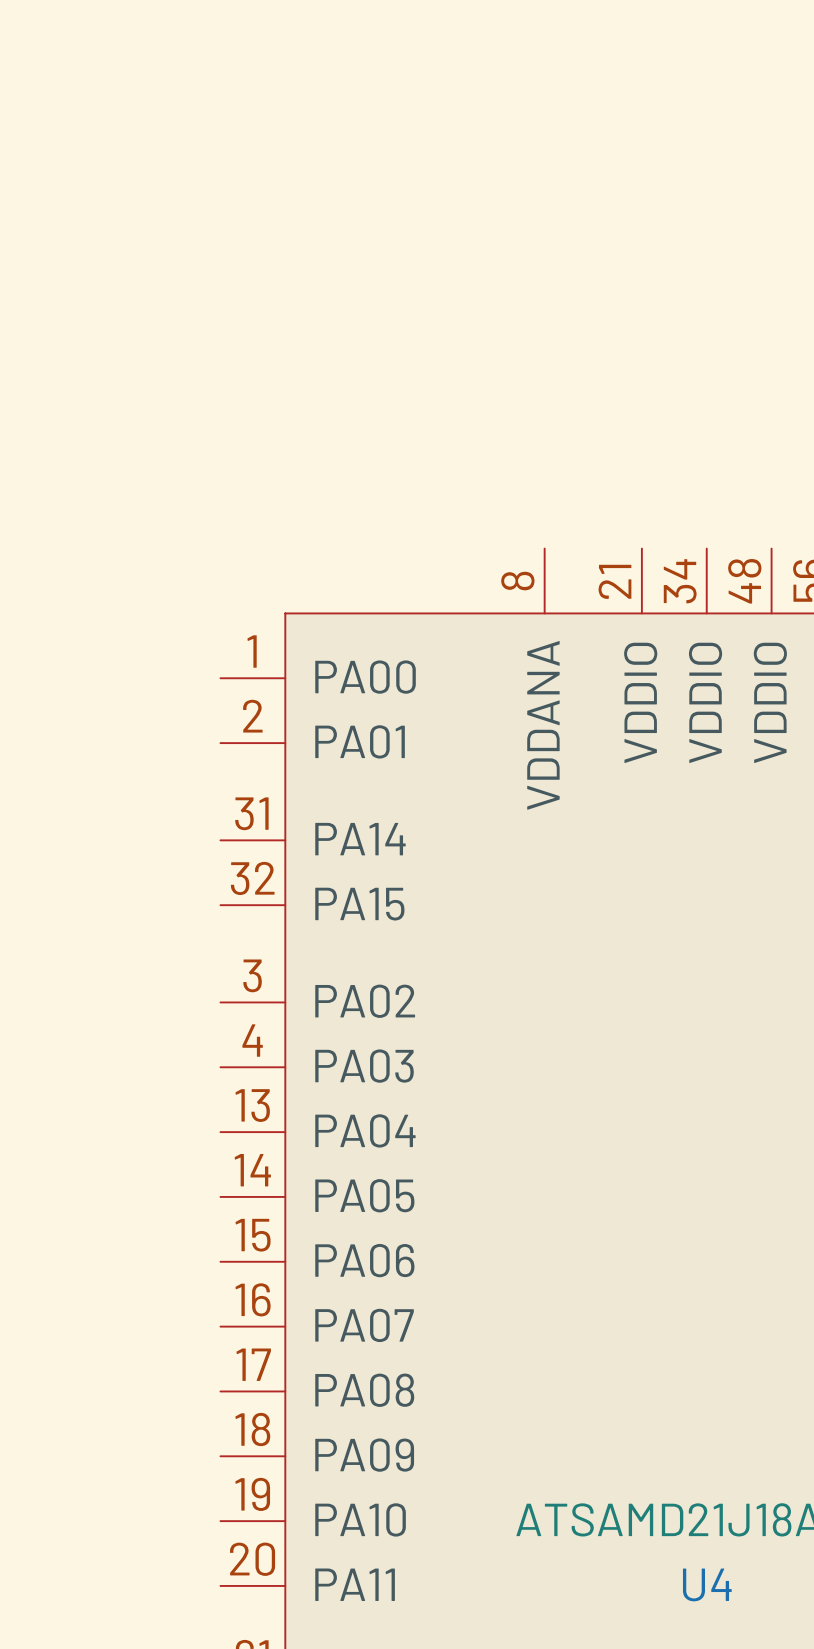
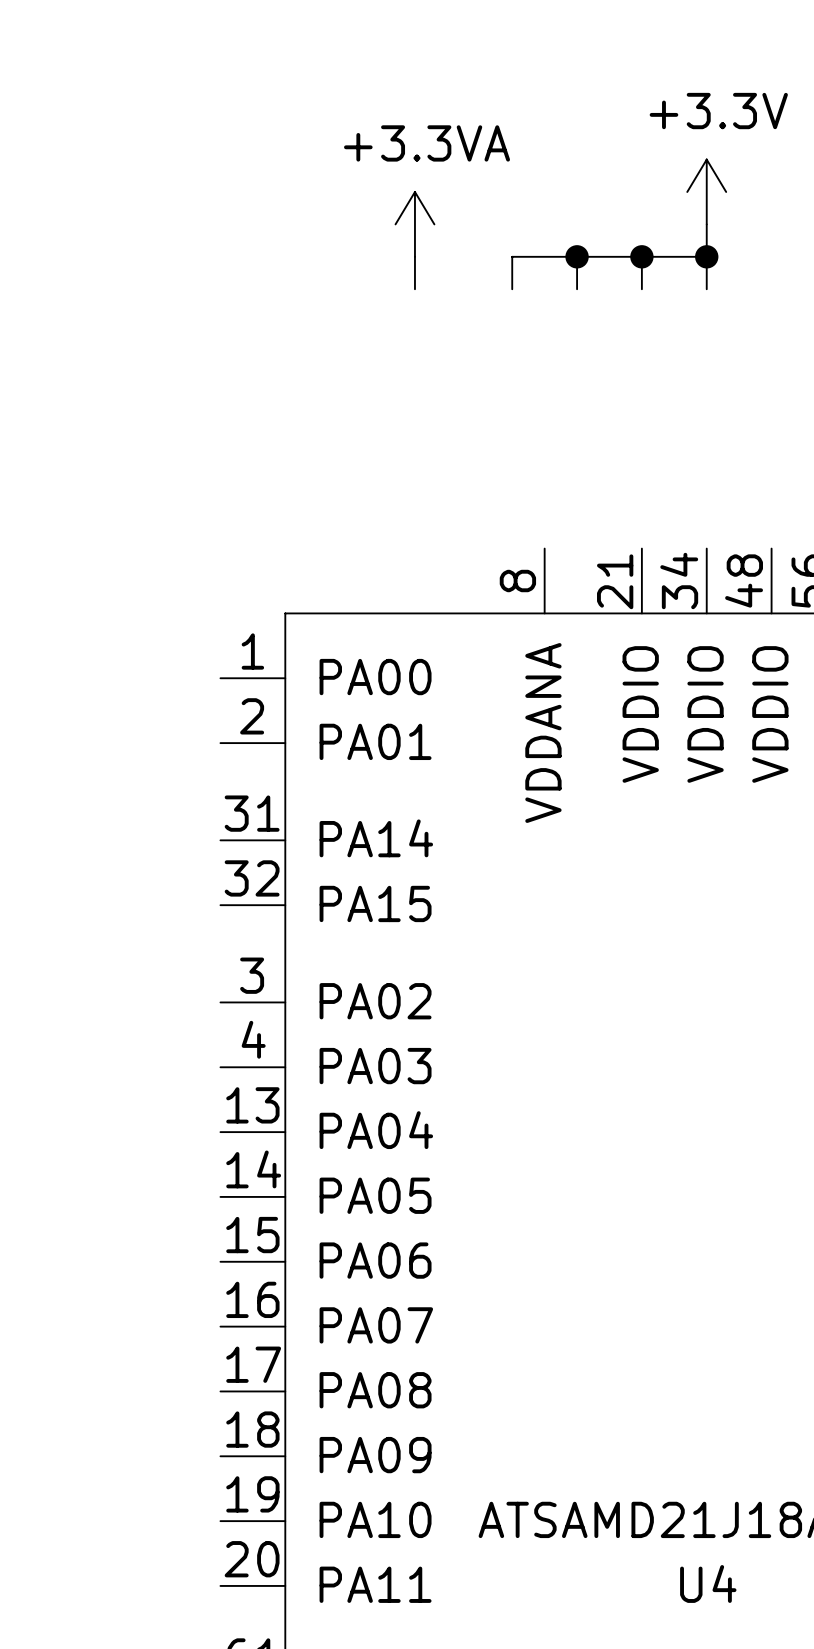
power symbol: none -> +3.3V (706, 191)
power symbol: none -> +3.3VA (414, 224)
wire: none -> (706, 224) (706, 289)
wire: none -> (414, 256) (414, 289)
wire: none -> (577, 256) (577, 289)
junction: none -> (577, 256)
wire: none -> (641, 256) (641, 289)
junction: none -> (641, 256)
wire: none -> (706, 256) (512, 256) (512, 289)
junction: none -> (706, 256)

